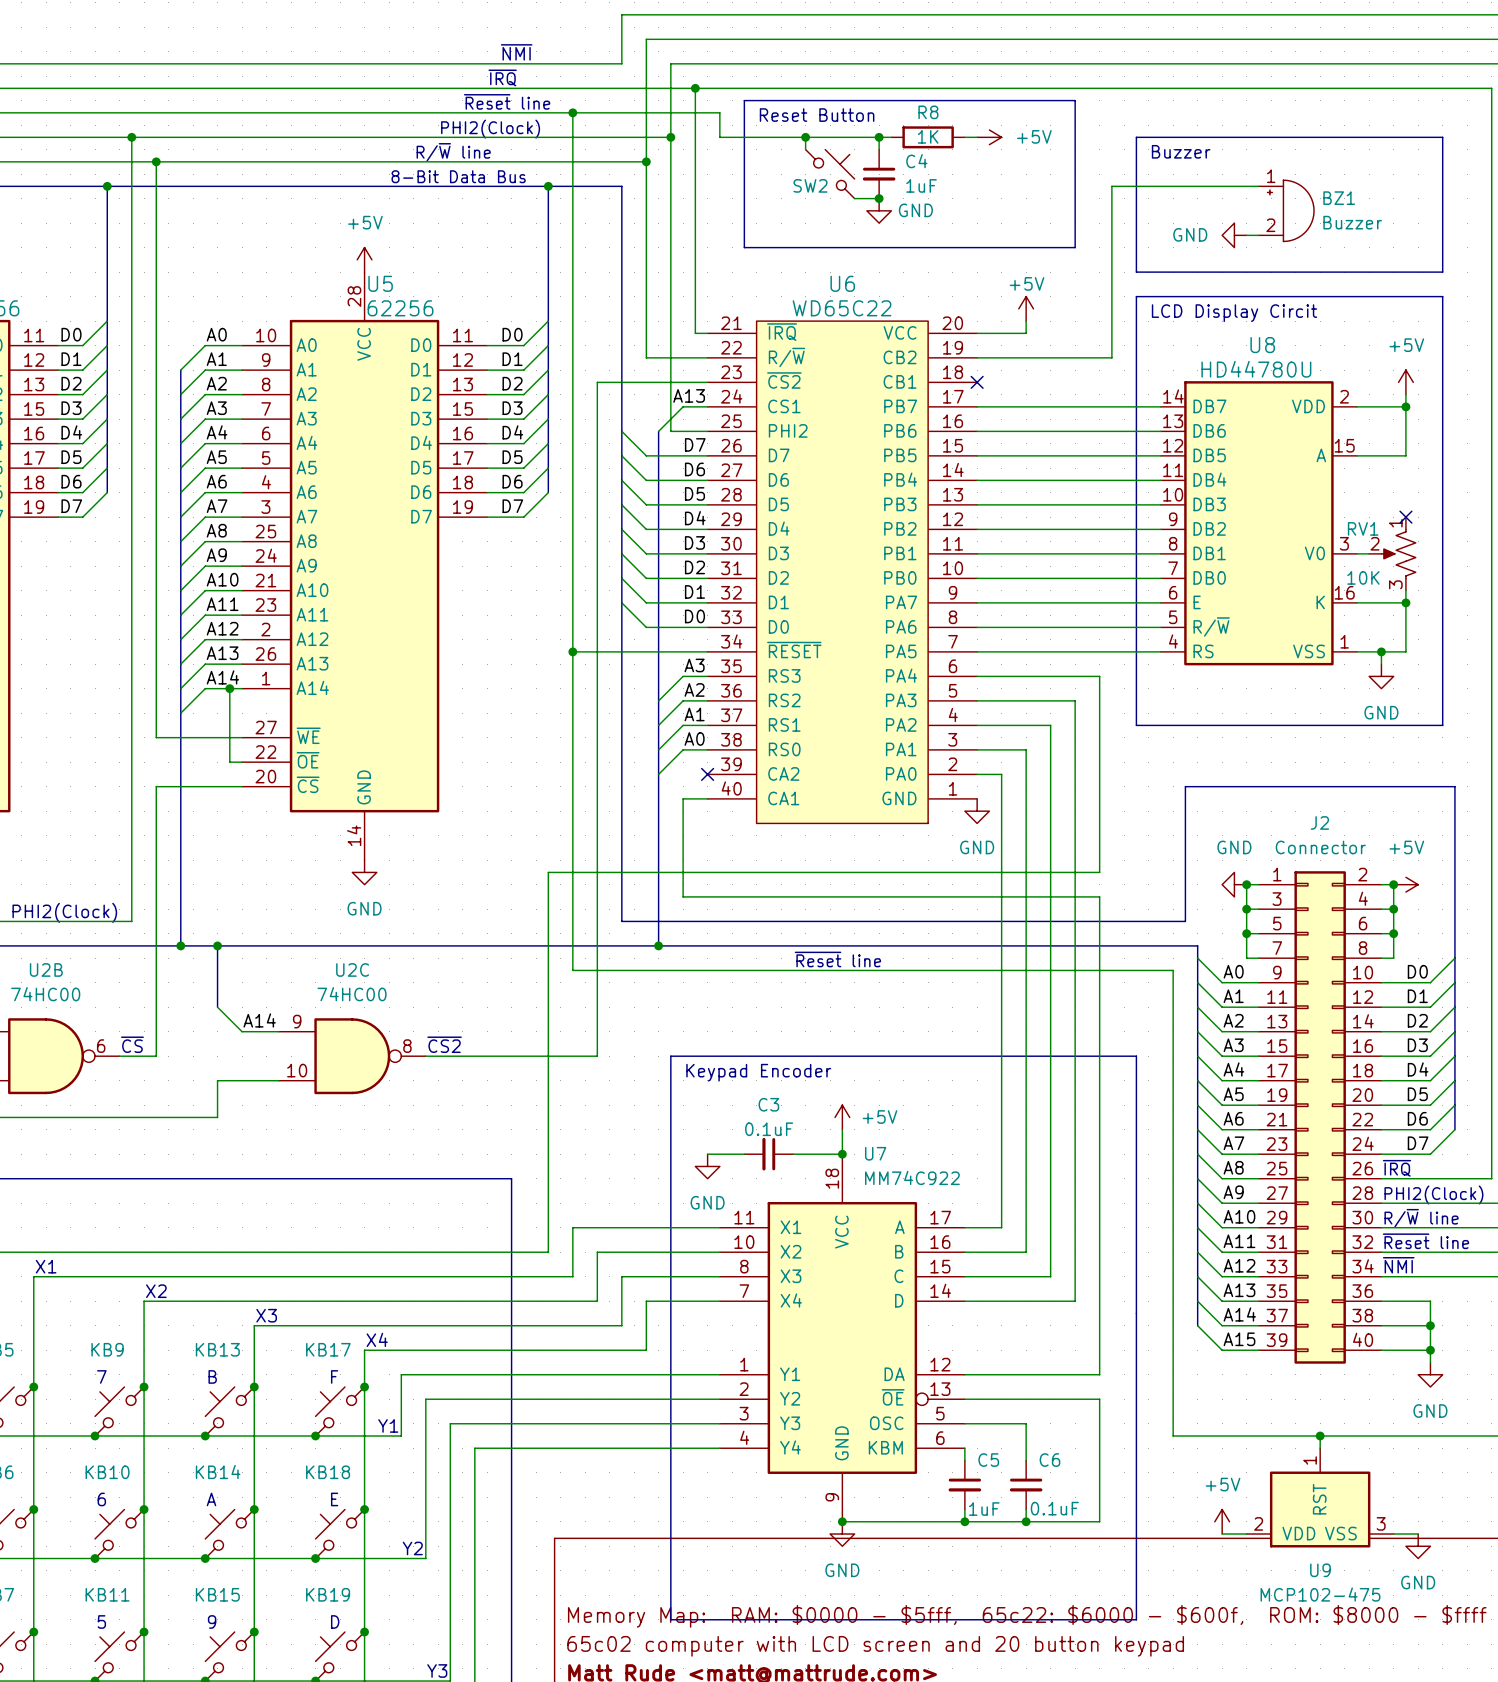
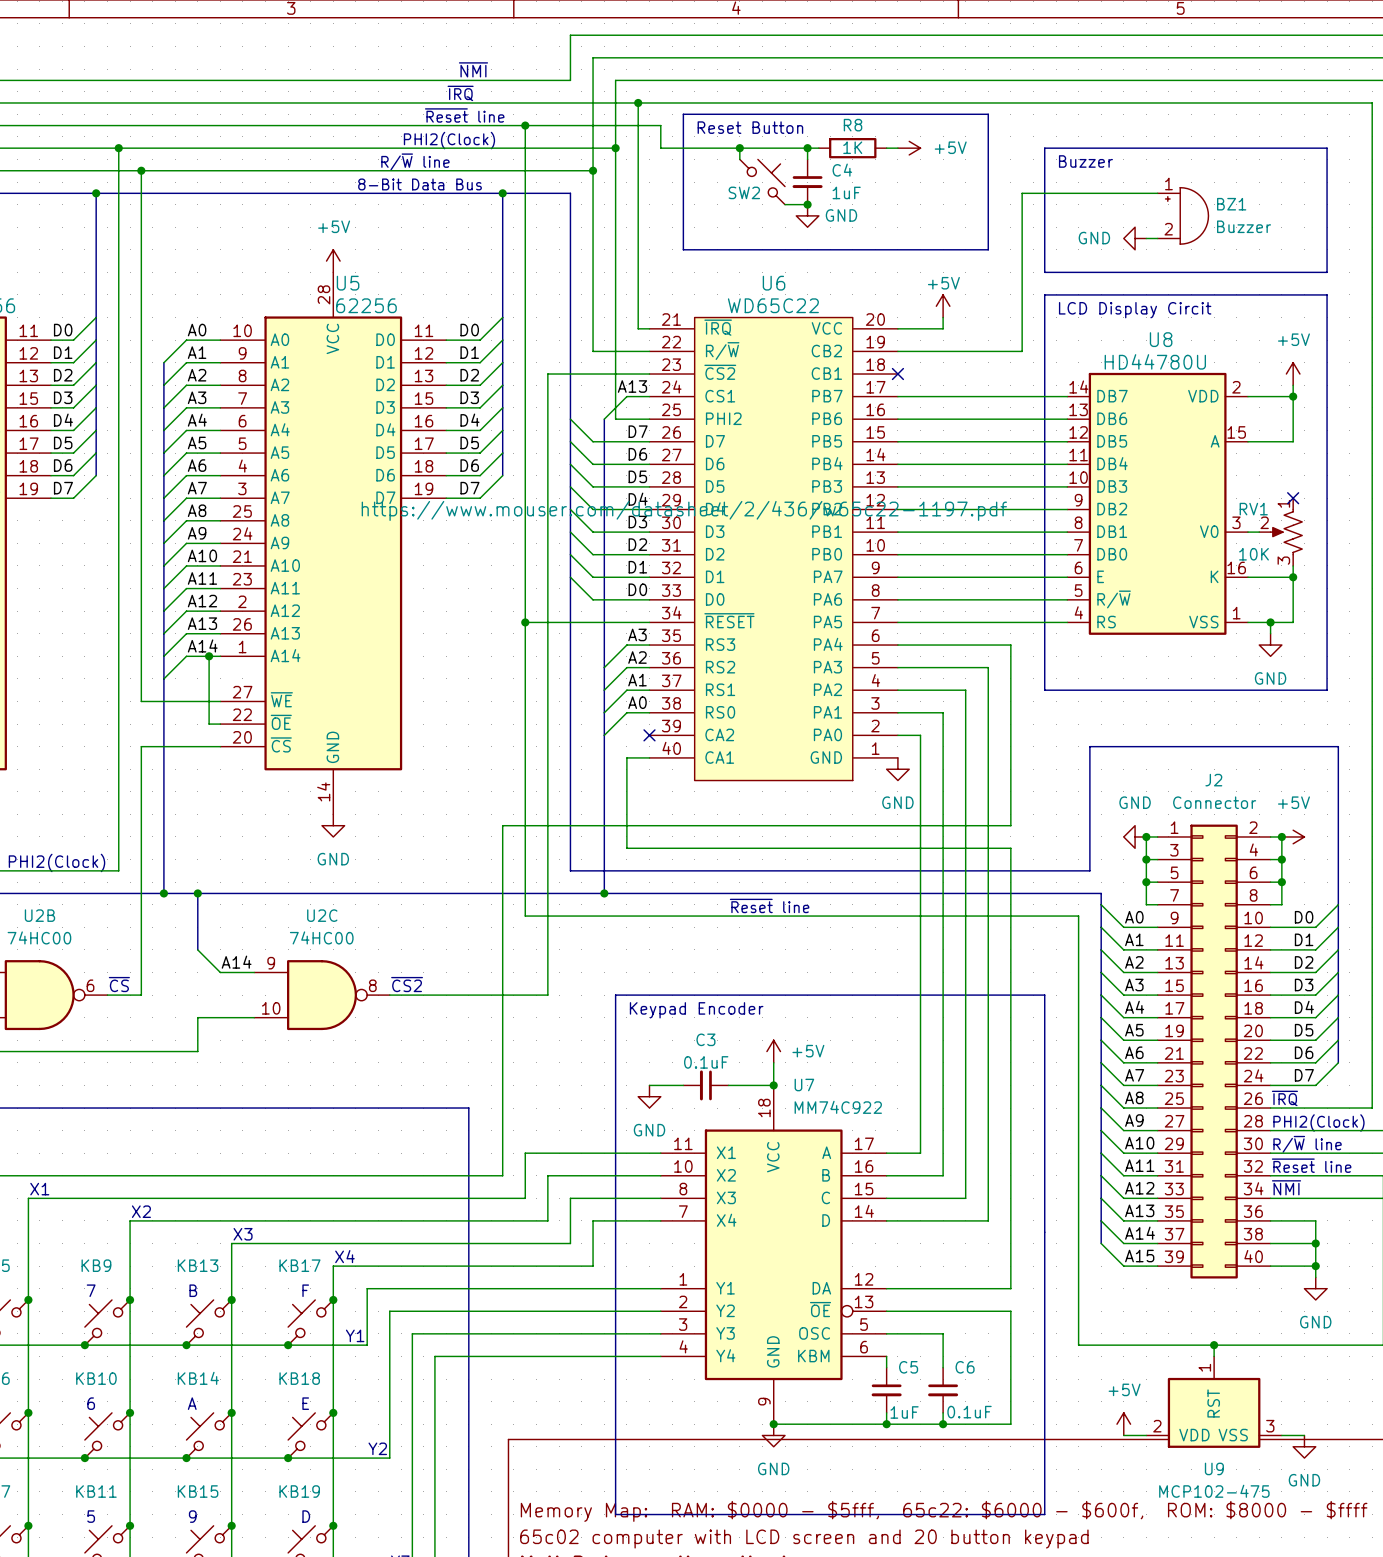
U6 text: none -> https://www.mouser.com/datasheet/2/436/w65c22-1197.pdf (684, 510)

